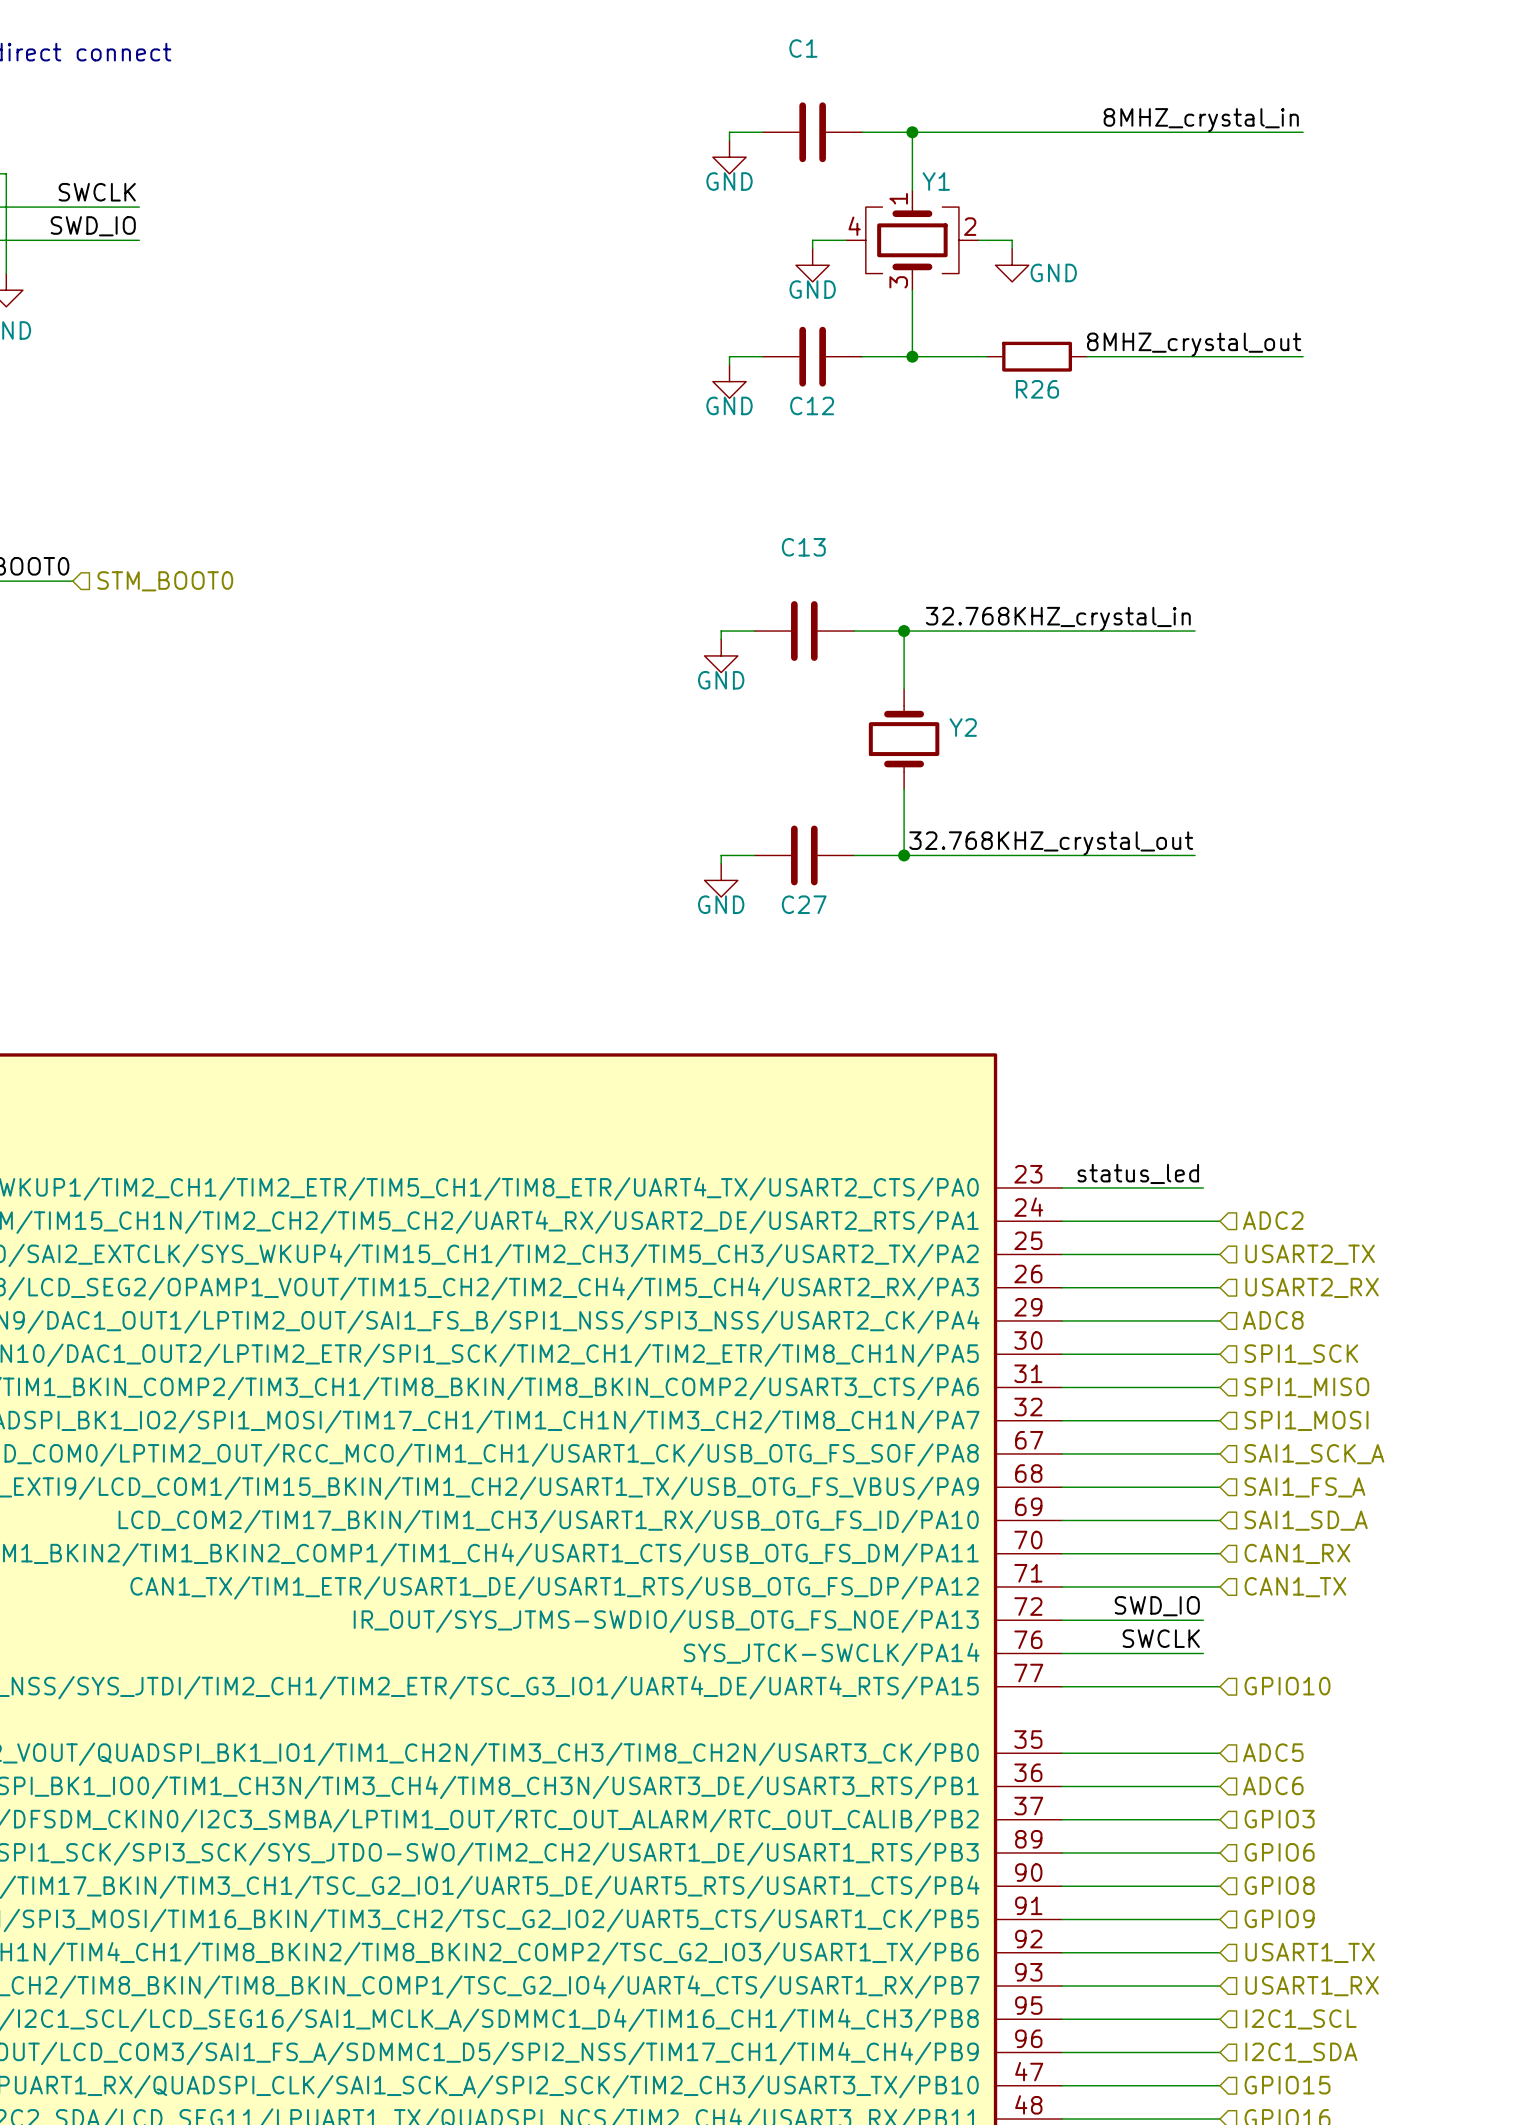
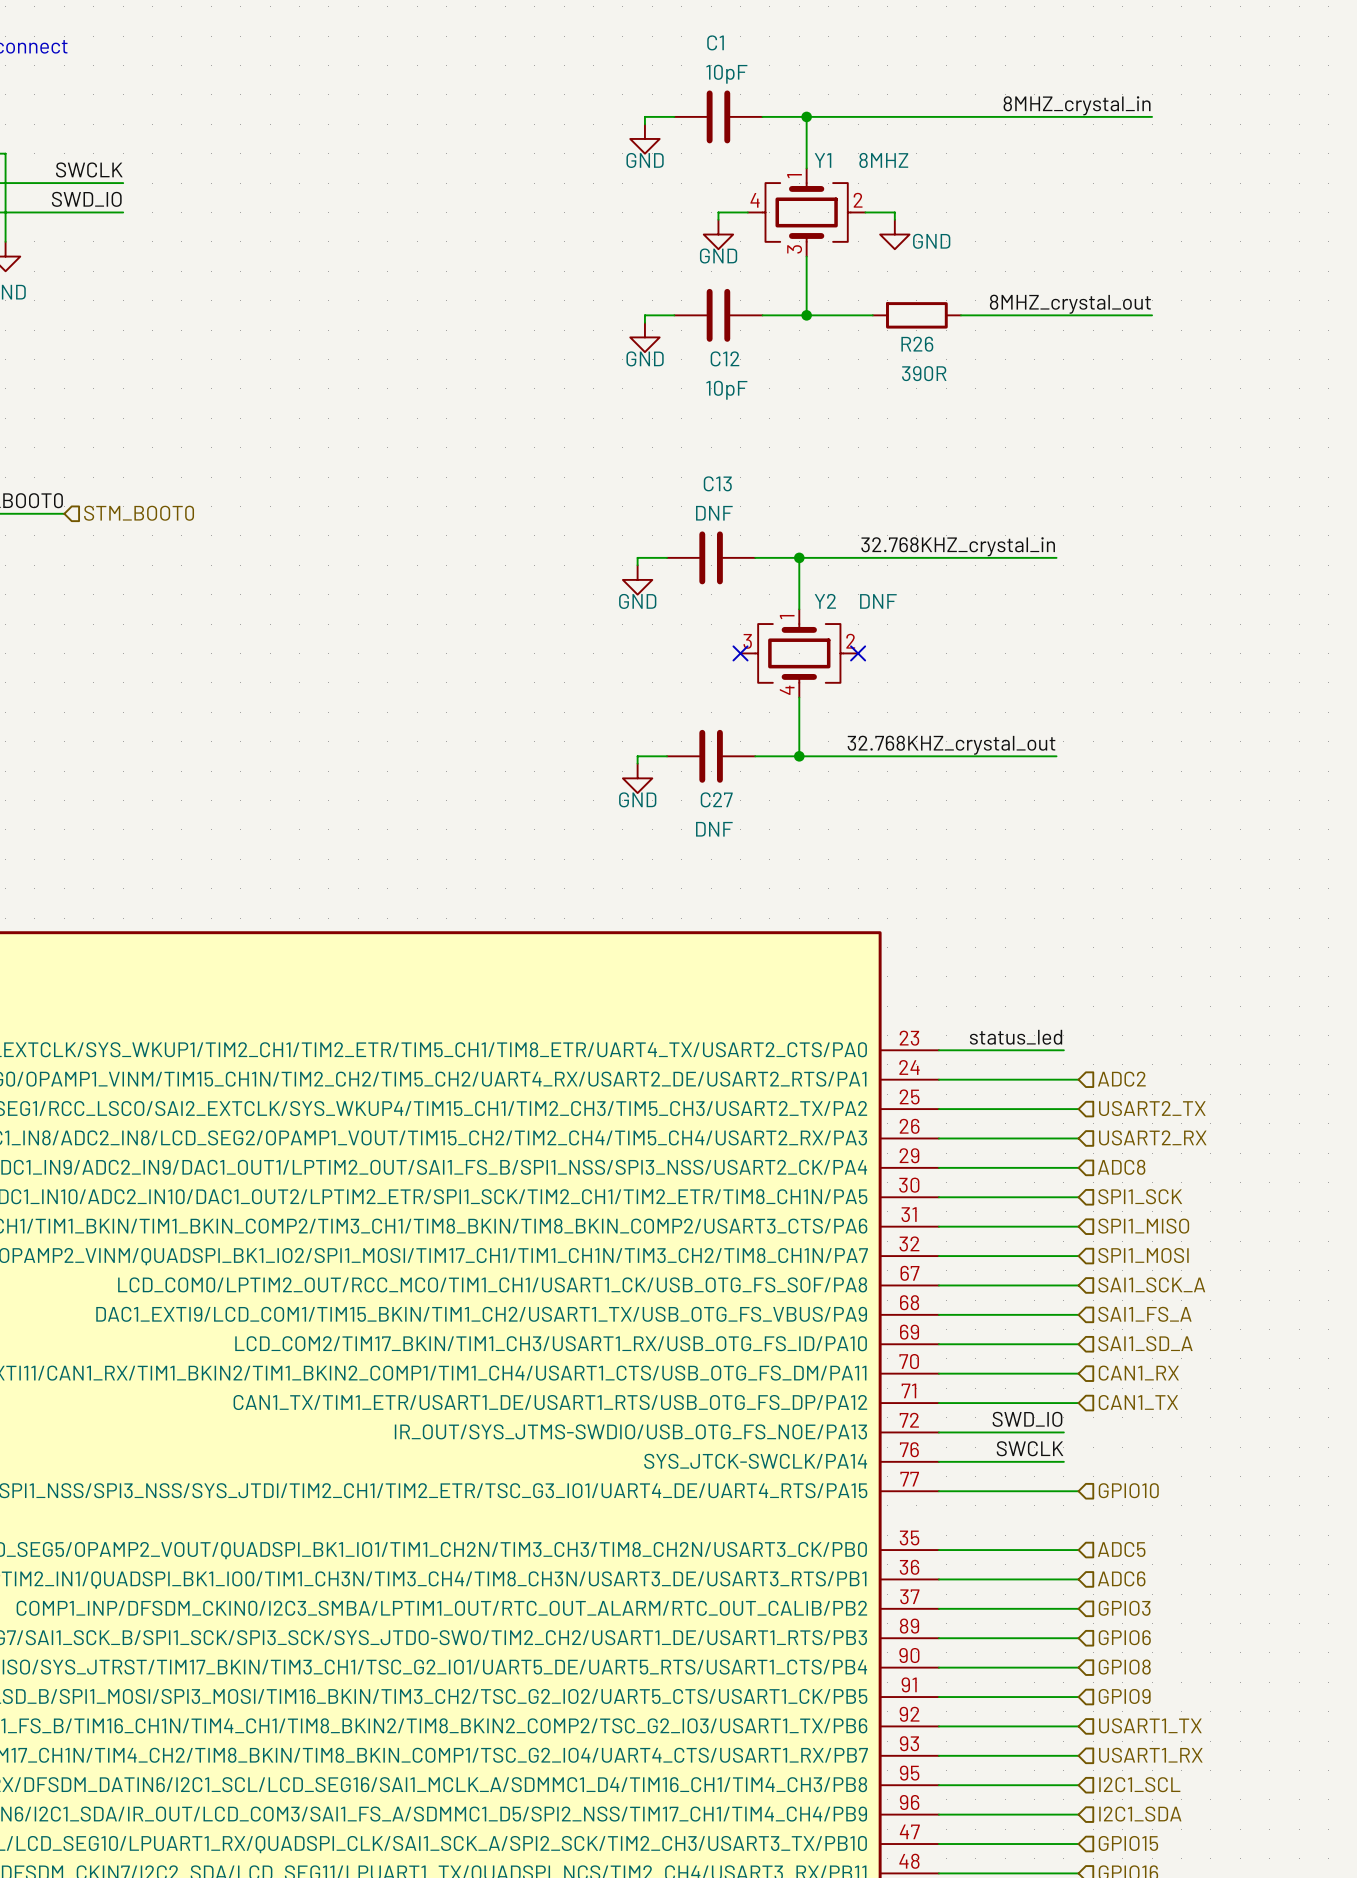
C1 value: none -> 10pF (726, 74)
Y1 value: none -> 8MHZ (883, 160)
R26 value: none -> 390R (924, 373)
C12 value: none -> 10pF (726, 390)
C13 value: none -> DNF (714, 513)
Y2 value: none -> DNF (878, 601)
Y2 symbol: [868, 689, 940, 789] -> [740, 609, 859, 698]
Y2 name position: Y2 (963, 727) -> Y2 (825, 601)
no-connect mark: none -> (740, 653)
no-connect mark: none -> (858, 653)
C27 value: none -> DNF (714, 829)

